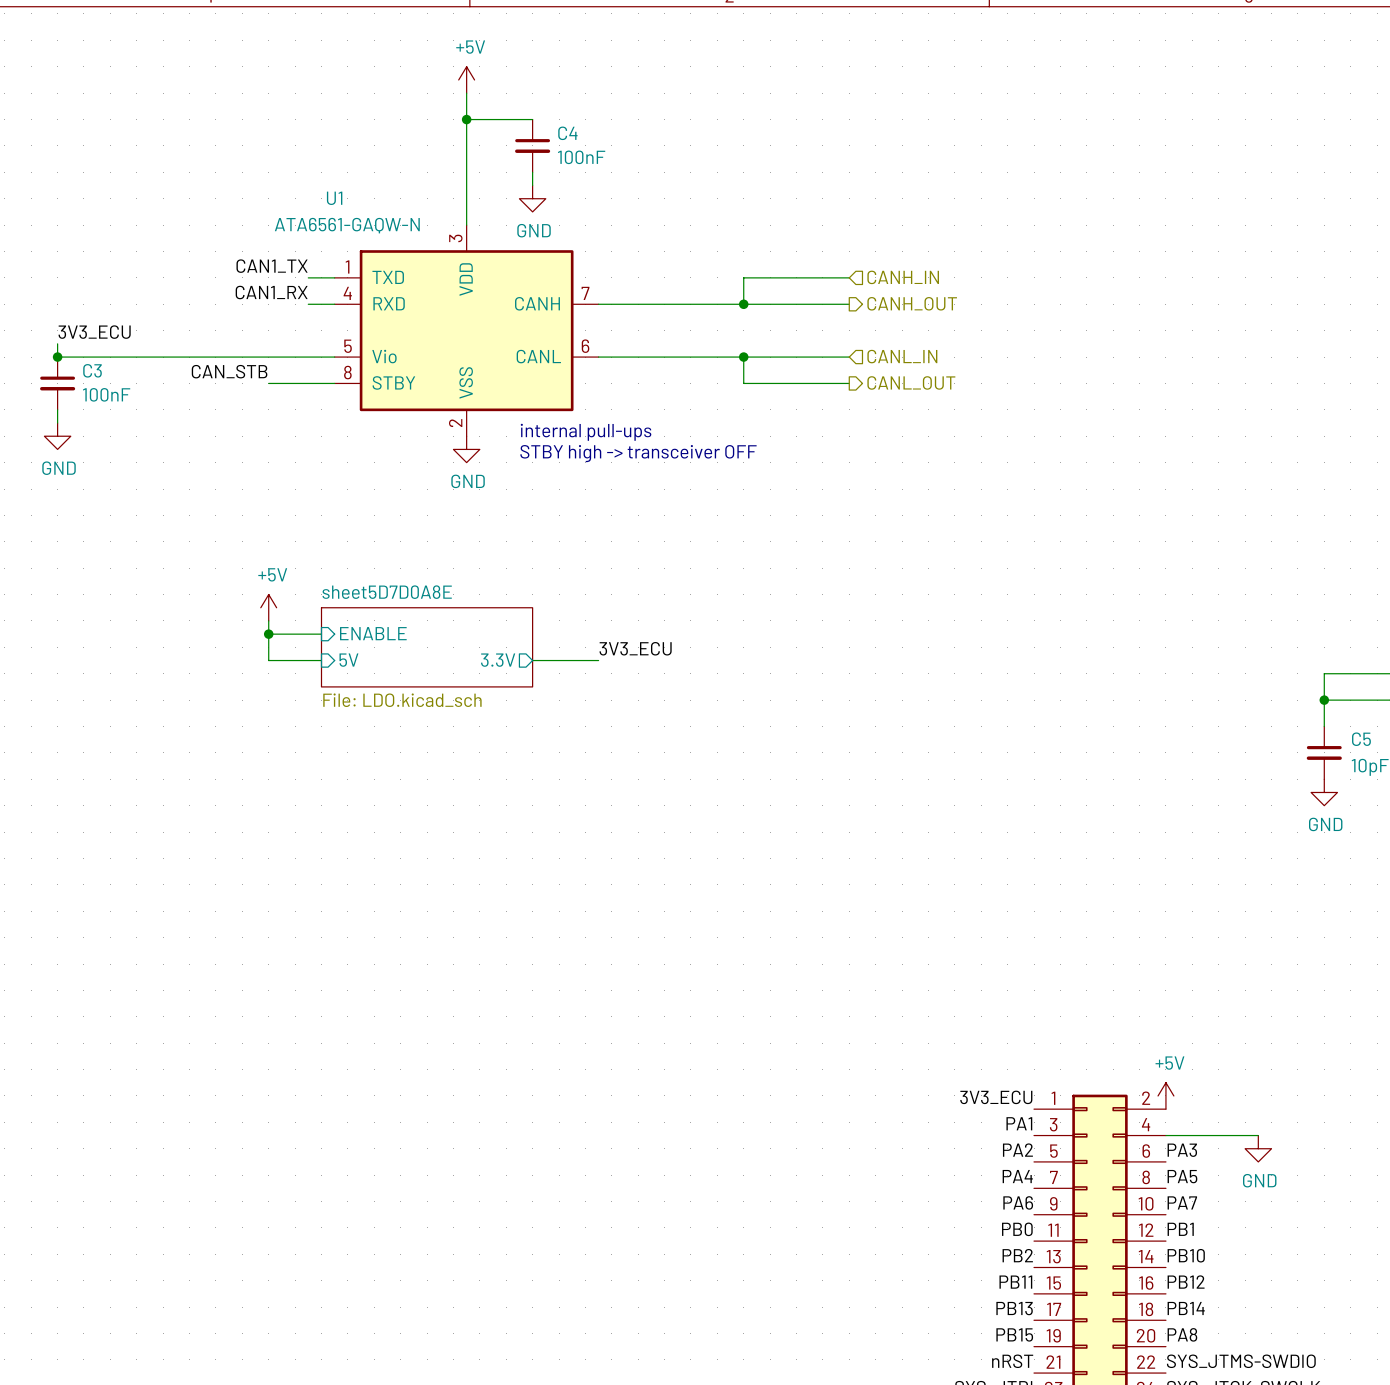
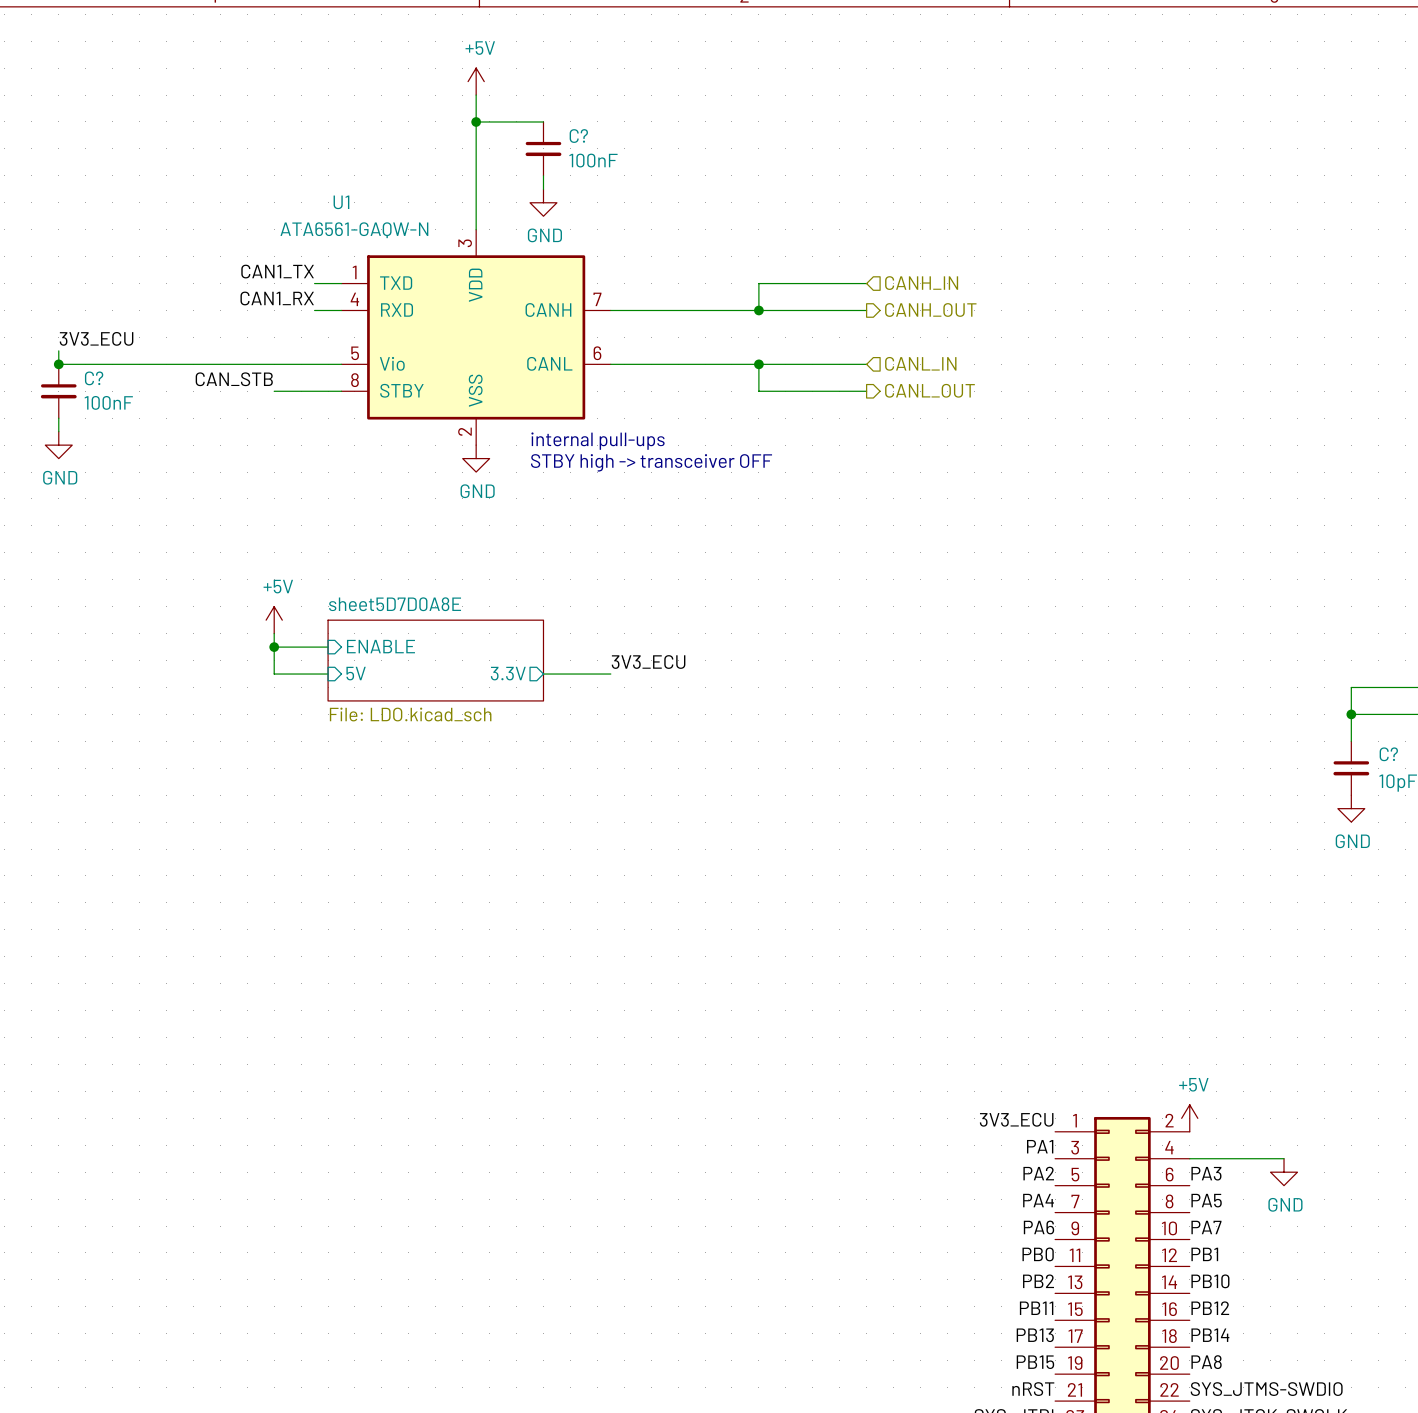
C4 name: C4 (567, 133) -> C? (578, 136)
C3 name: C3 (92, 370) -> C? (94, 378)
C5 name: C5 (1361, 739) -> C? (1388, 754)

